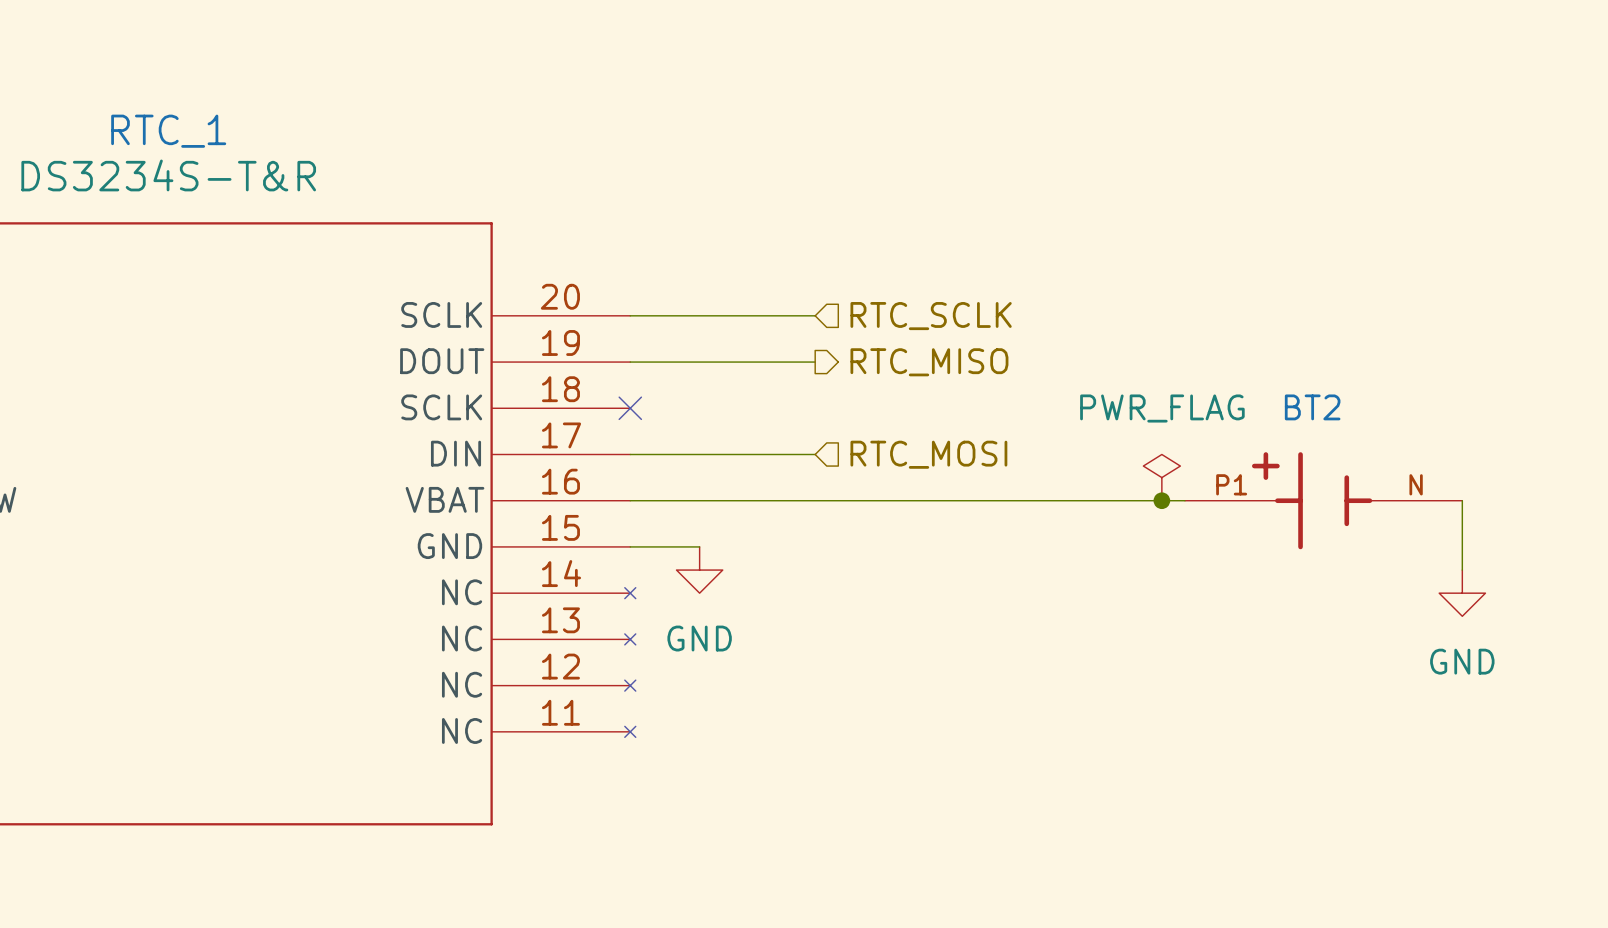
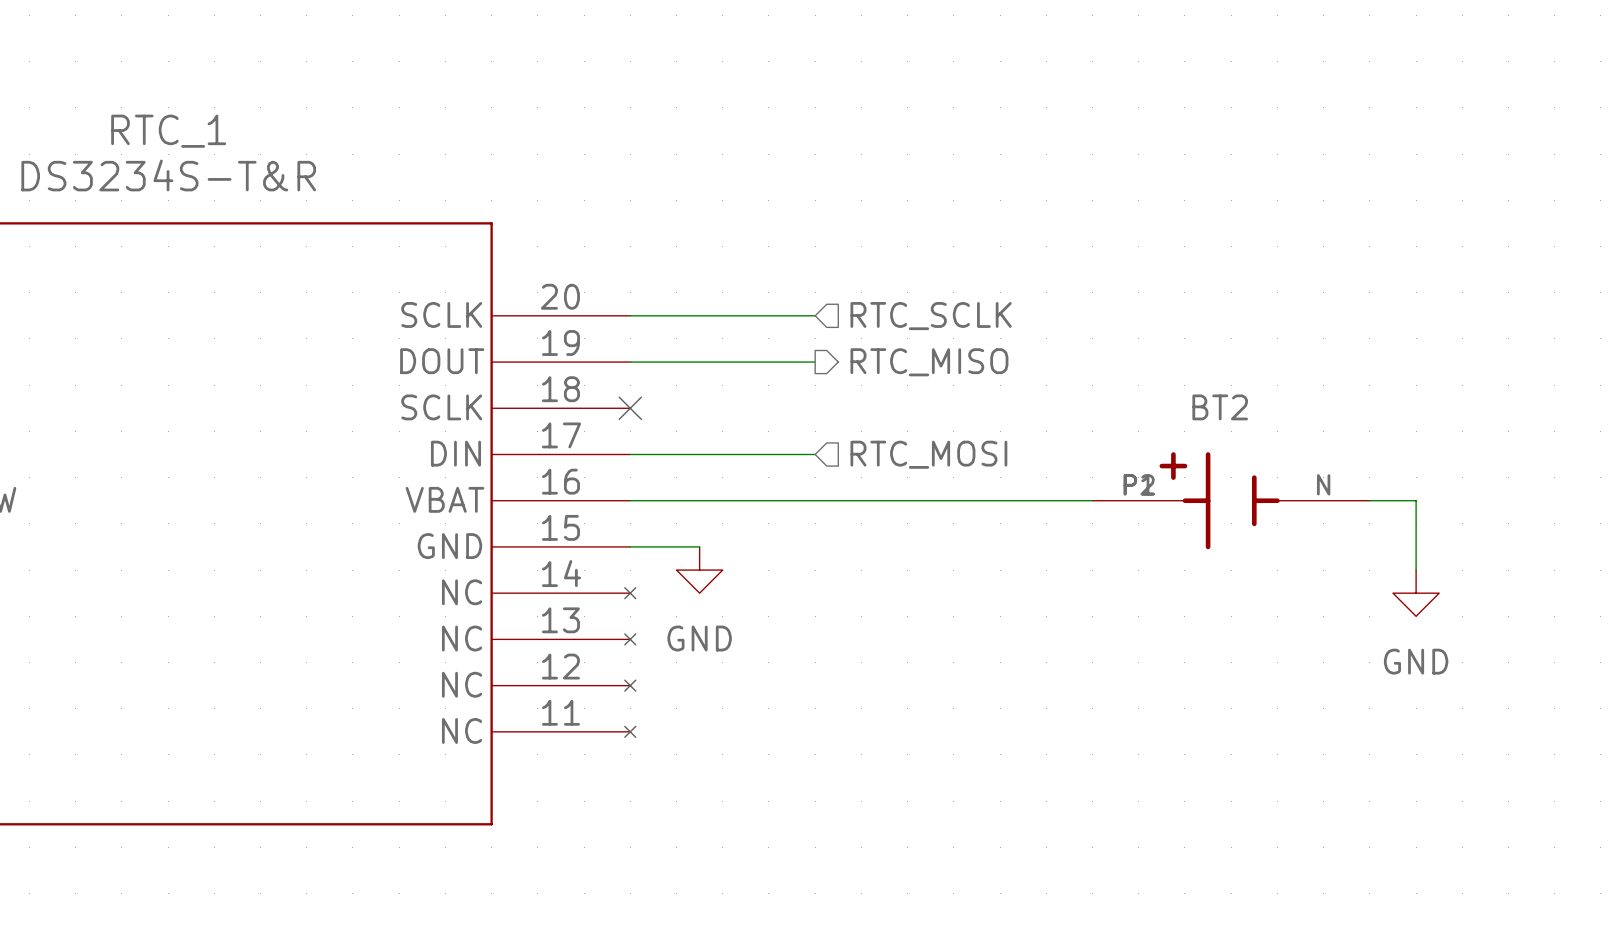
BT2 symbol: [1184, 452, 1463, 550] -> [1092, 452, 1370, 550]
power symbol: PWR_FLAG (1161, 477) -> none
junction: (1161, 500) -> none
wire: none -> (1369, 500) (1416, 500) (1416, 570)
wire: (1462, 500) (1462, 570) -> none
power symbol position: GND (1462, 593) -> GND (1416, 593)

